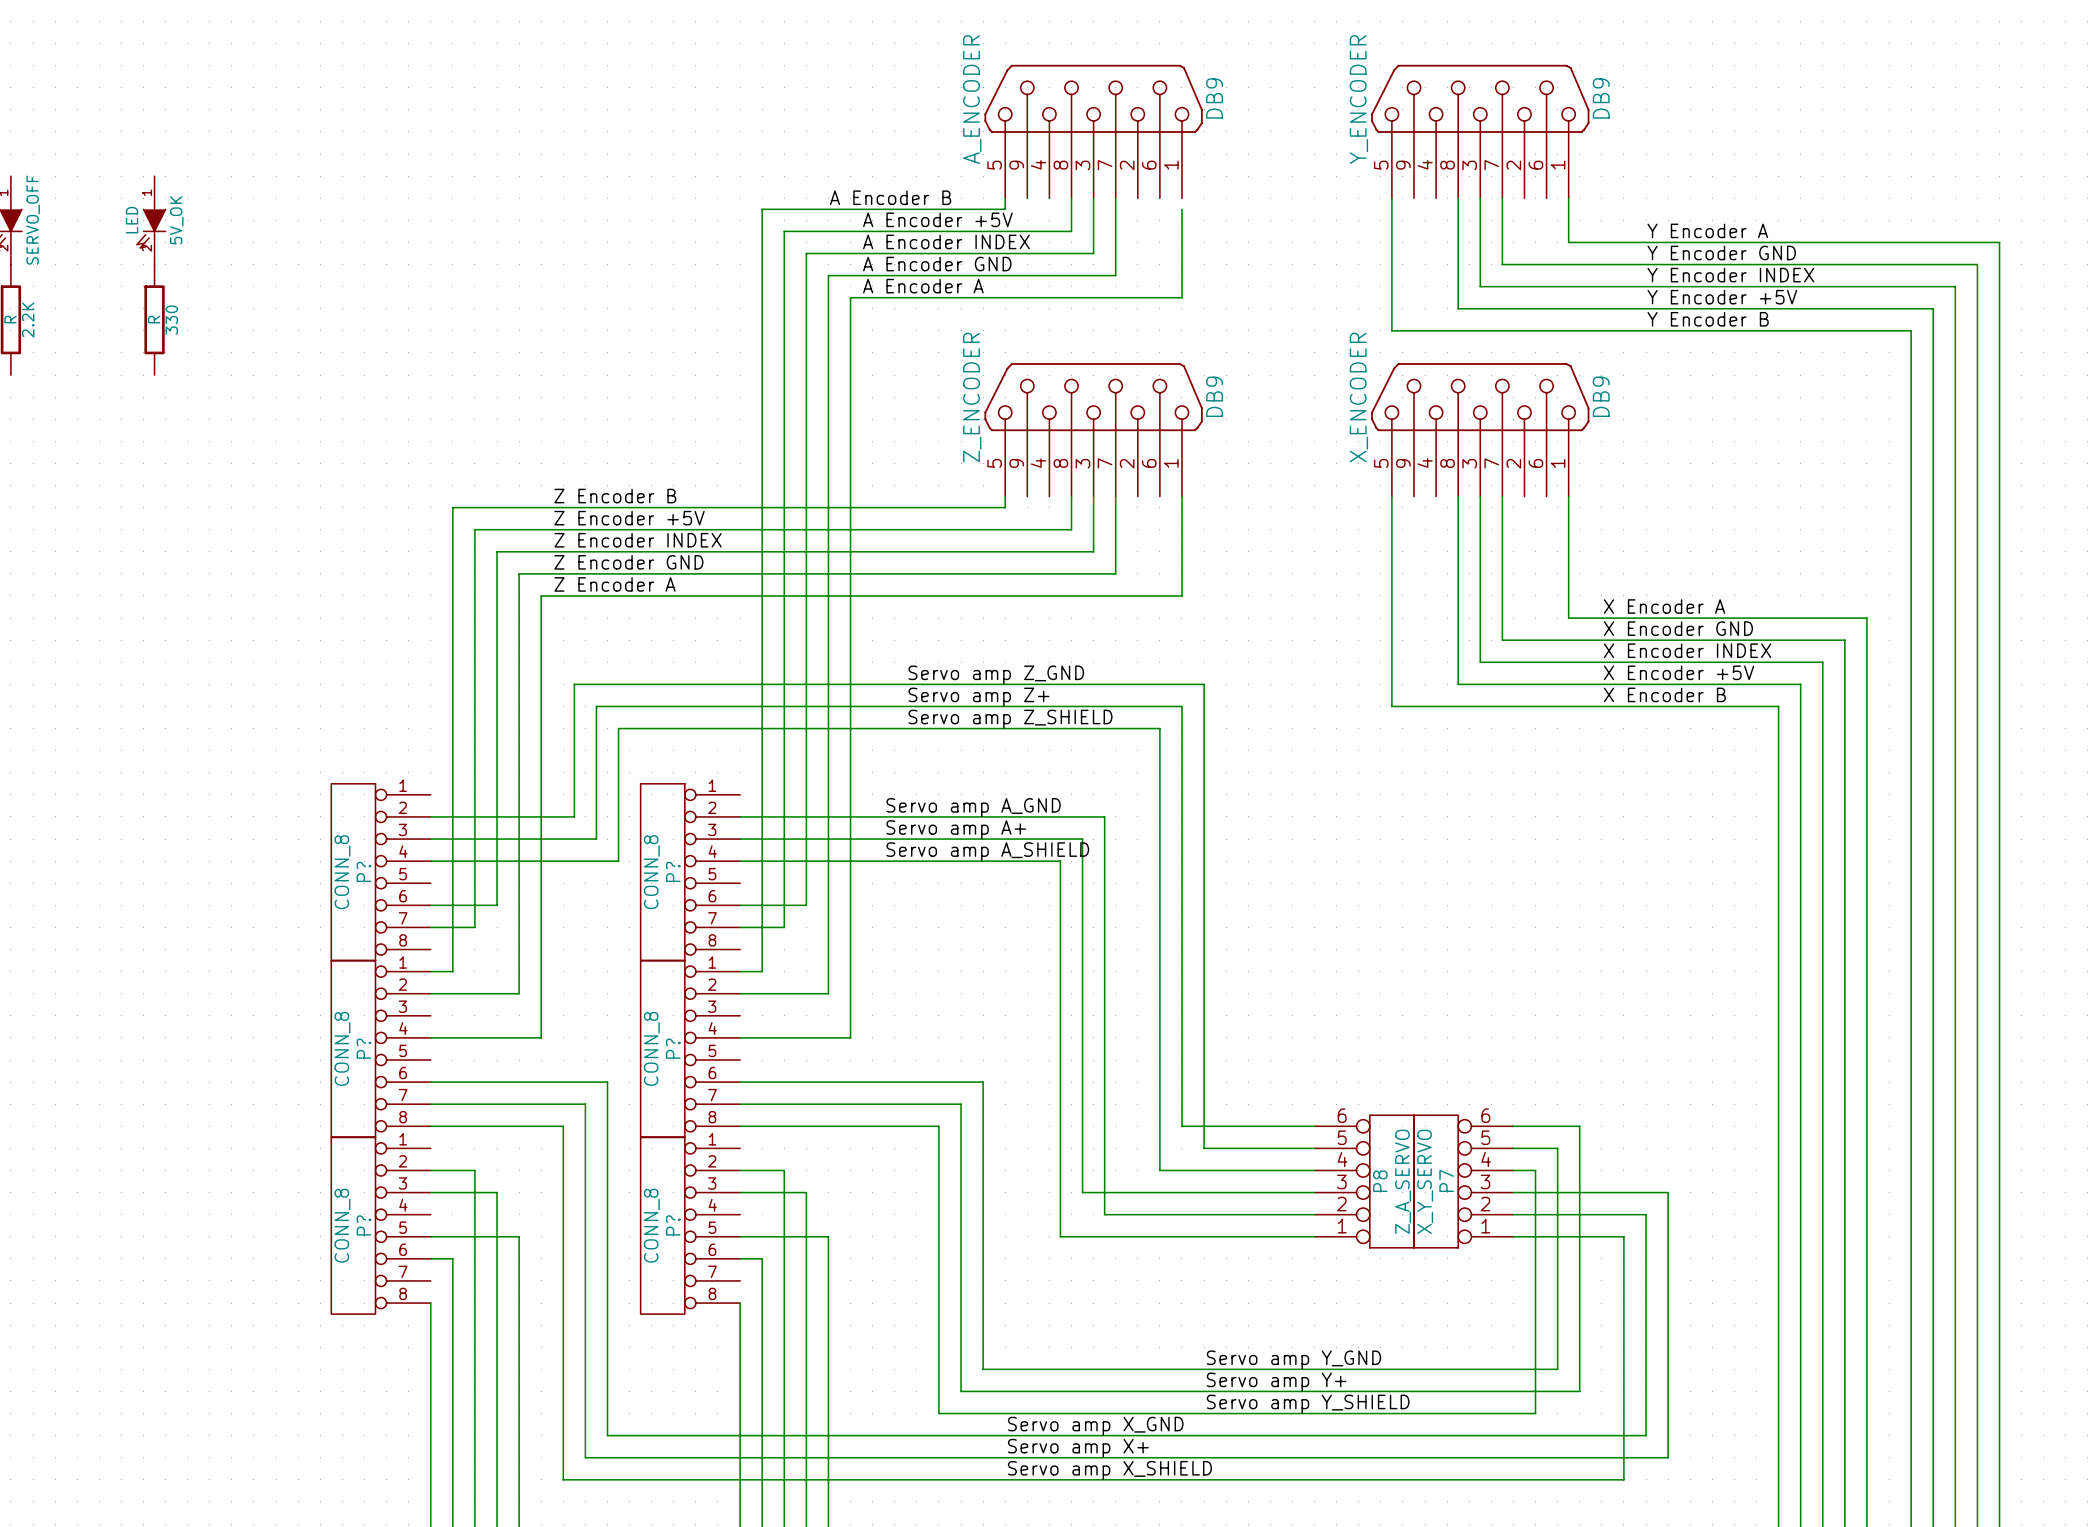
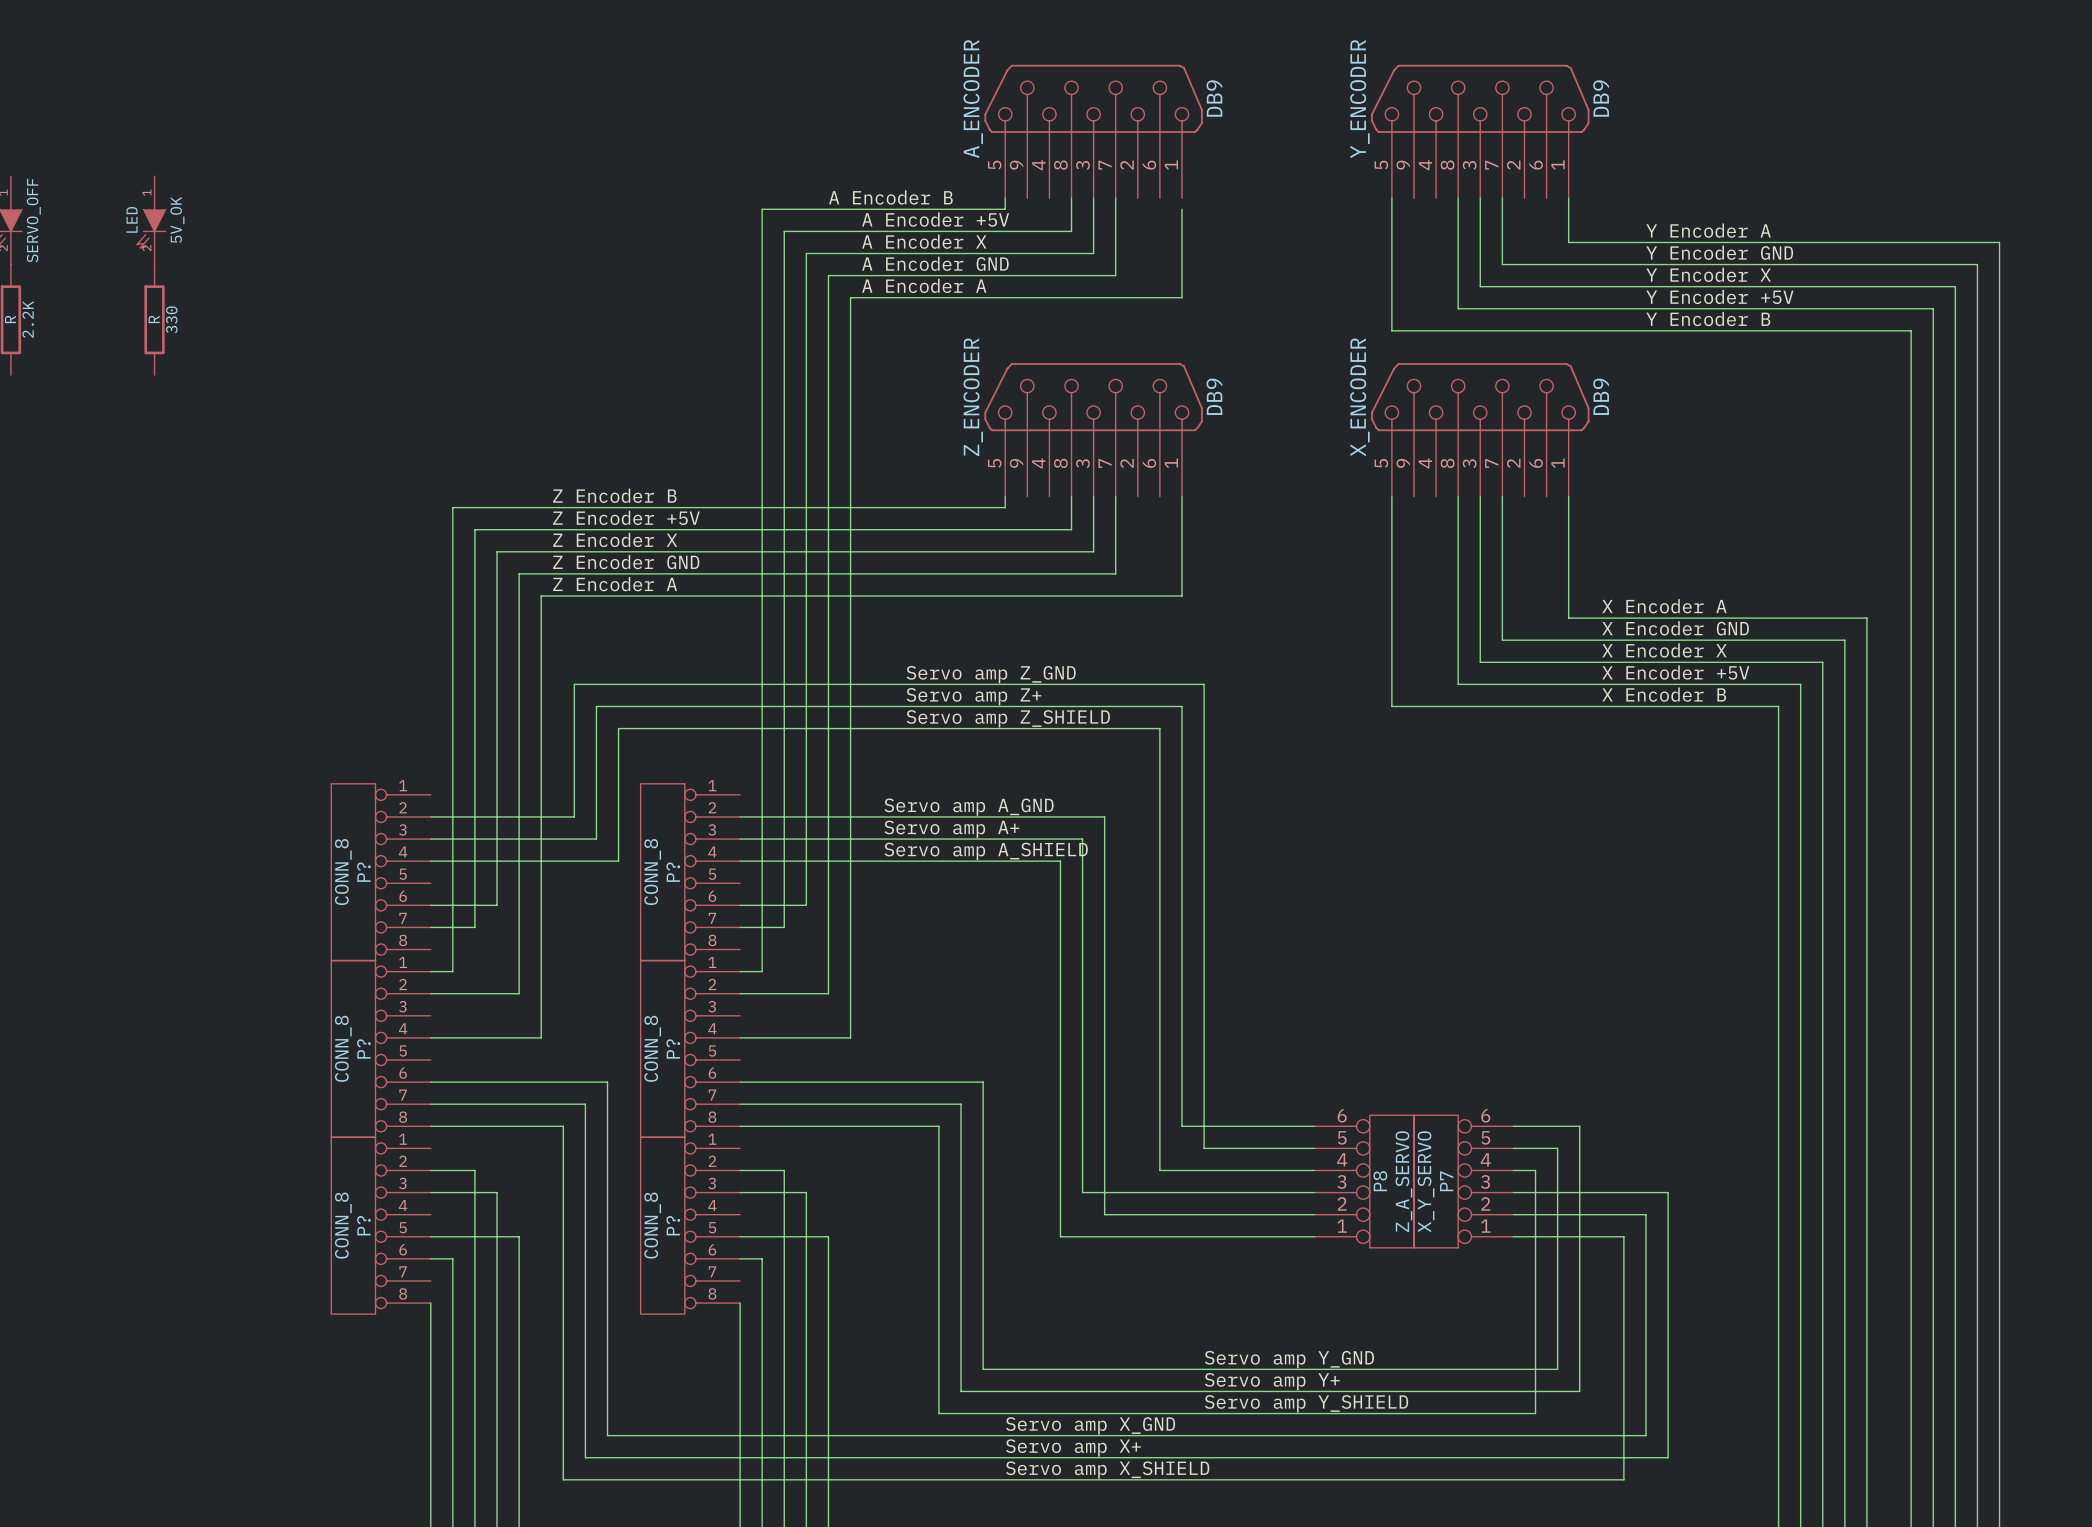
label: A Encoder INDEX (946, 241) -> A Encoder X (924, 241)
label: Y Encoder INDEX (1730, 275) -> Y Encoder X (1708, 274)
label: Z Encoder INDEX (638, 540) -> Z Encoder X (615, 539)
label: X Encoder INDEX (1687, 650) -> X Encoder X (1664, 650)

